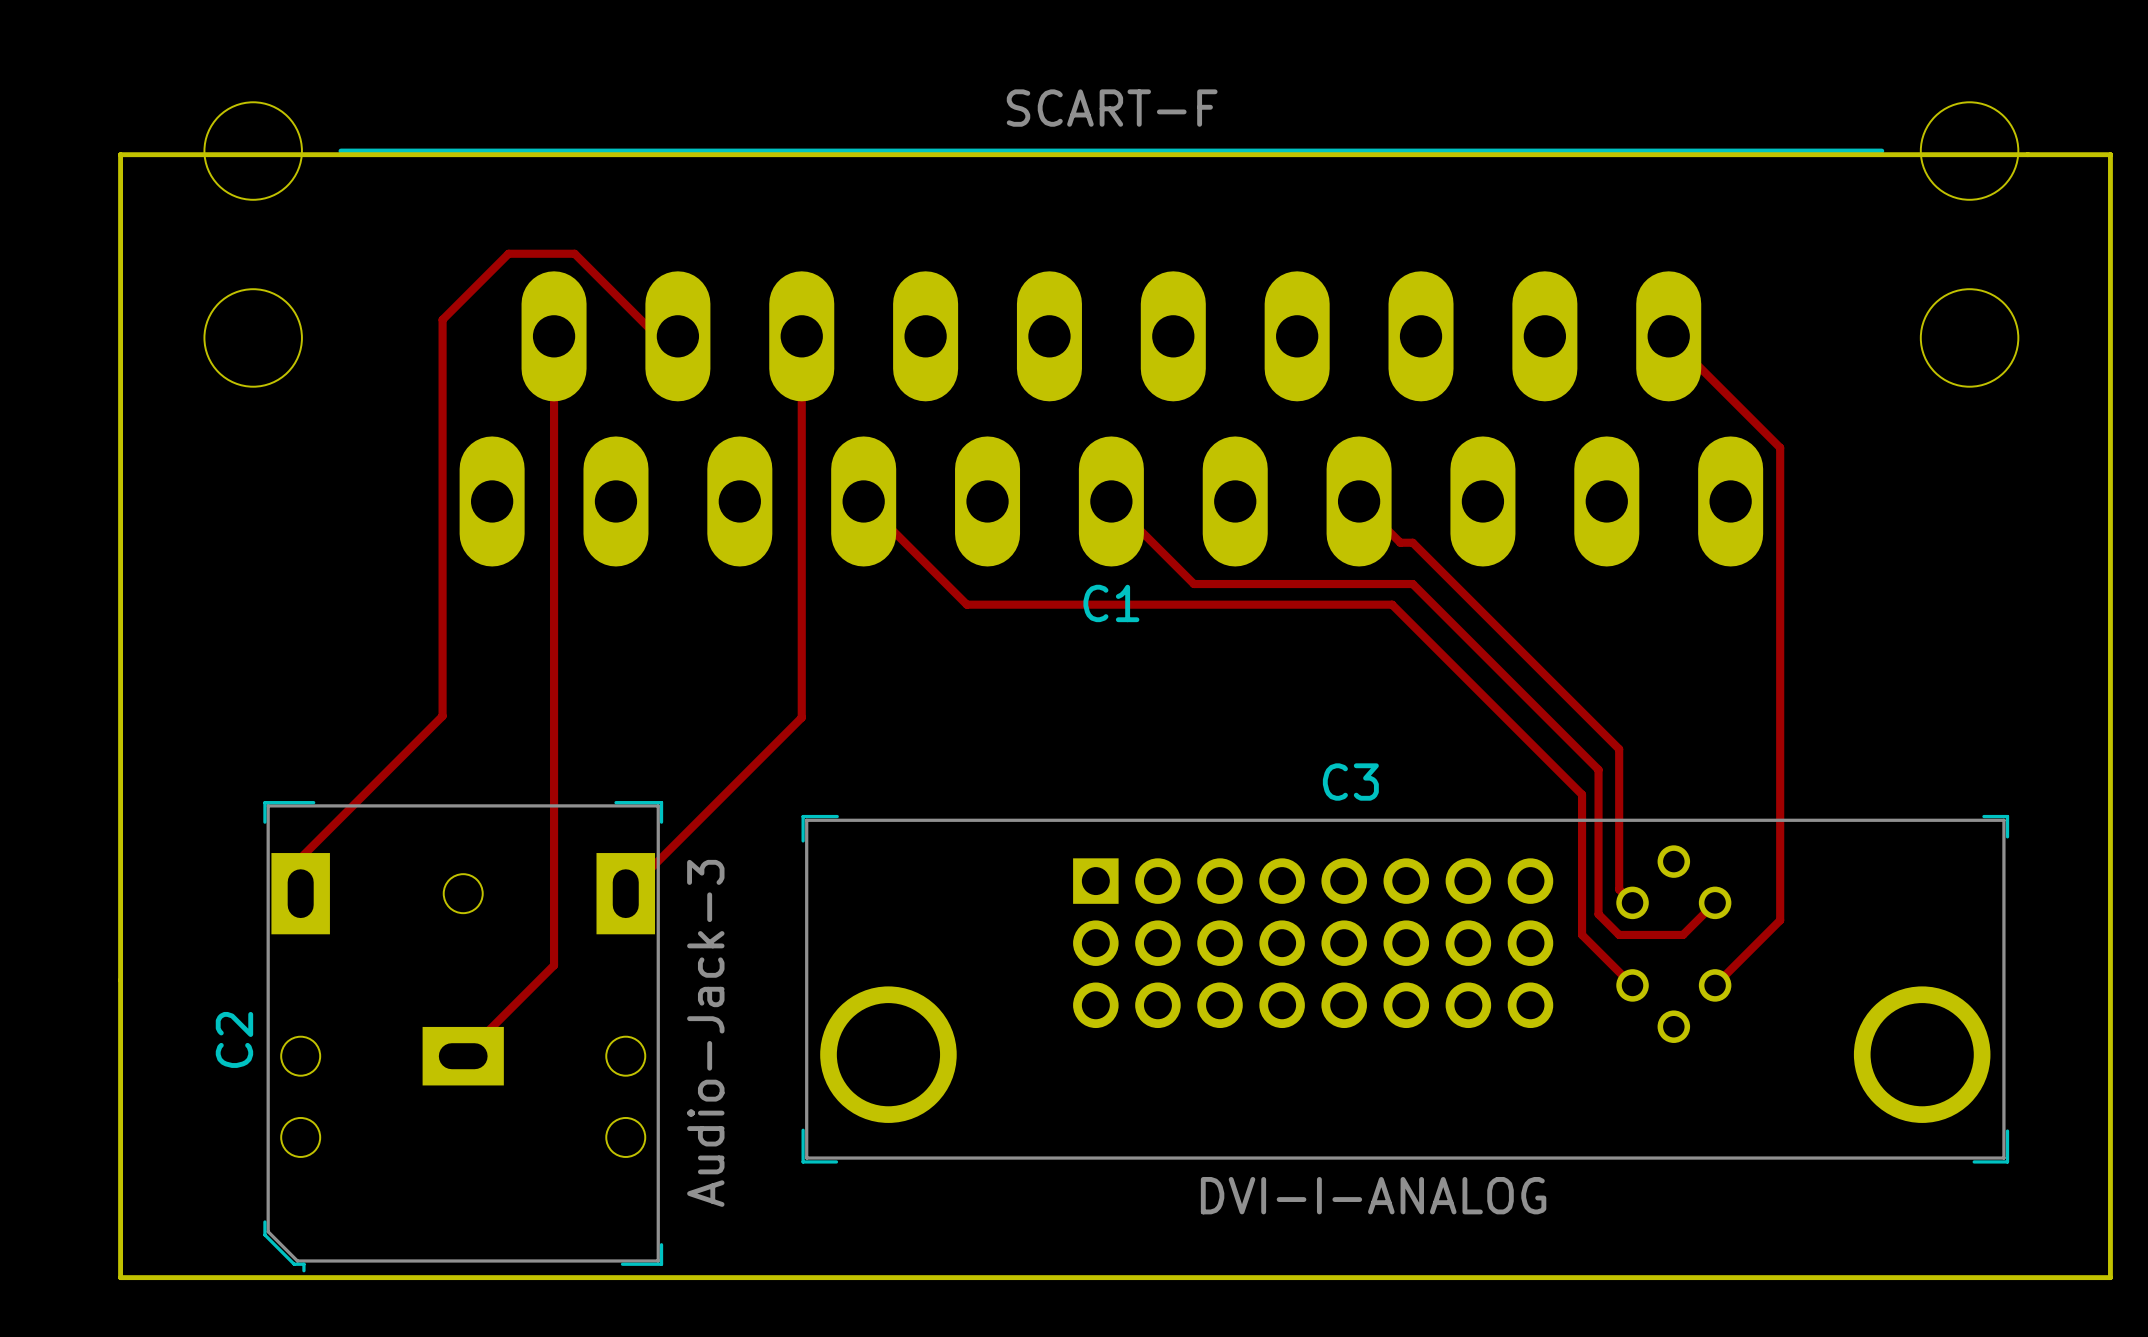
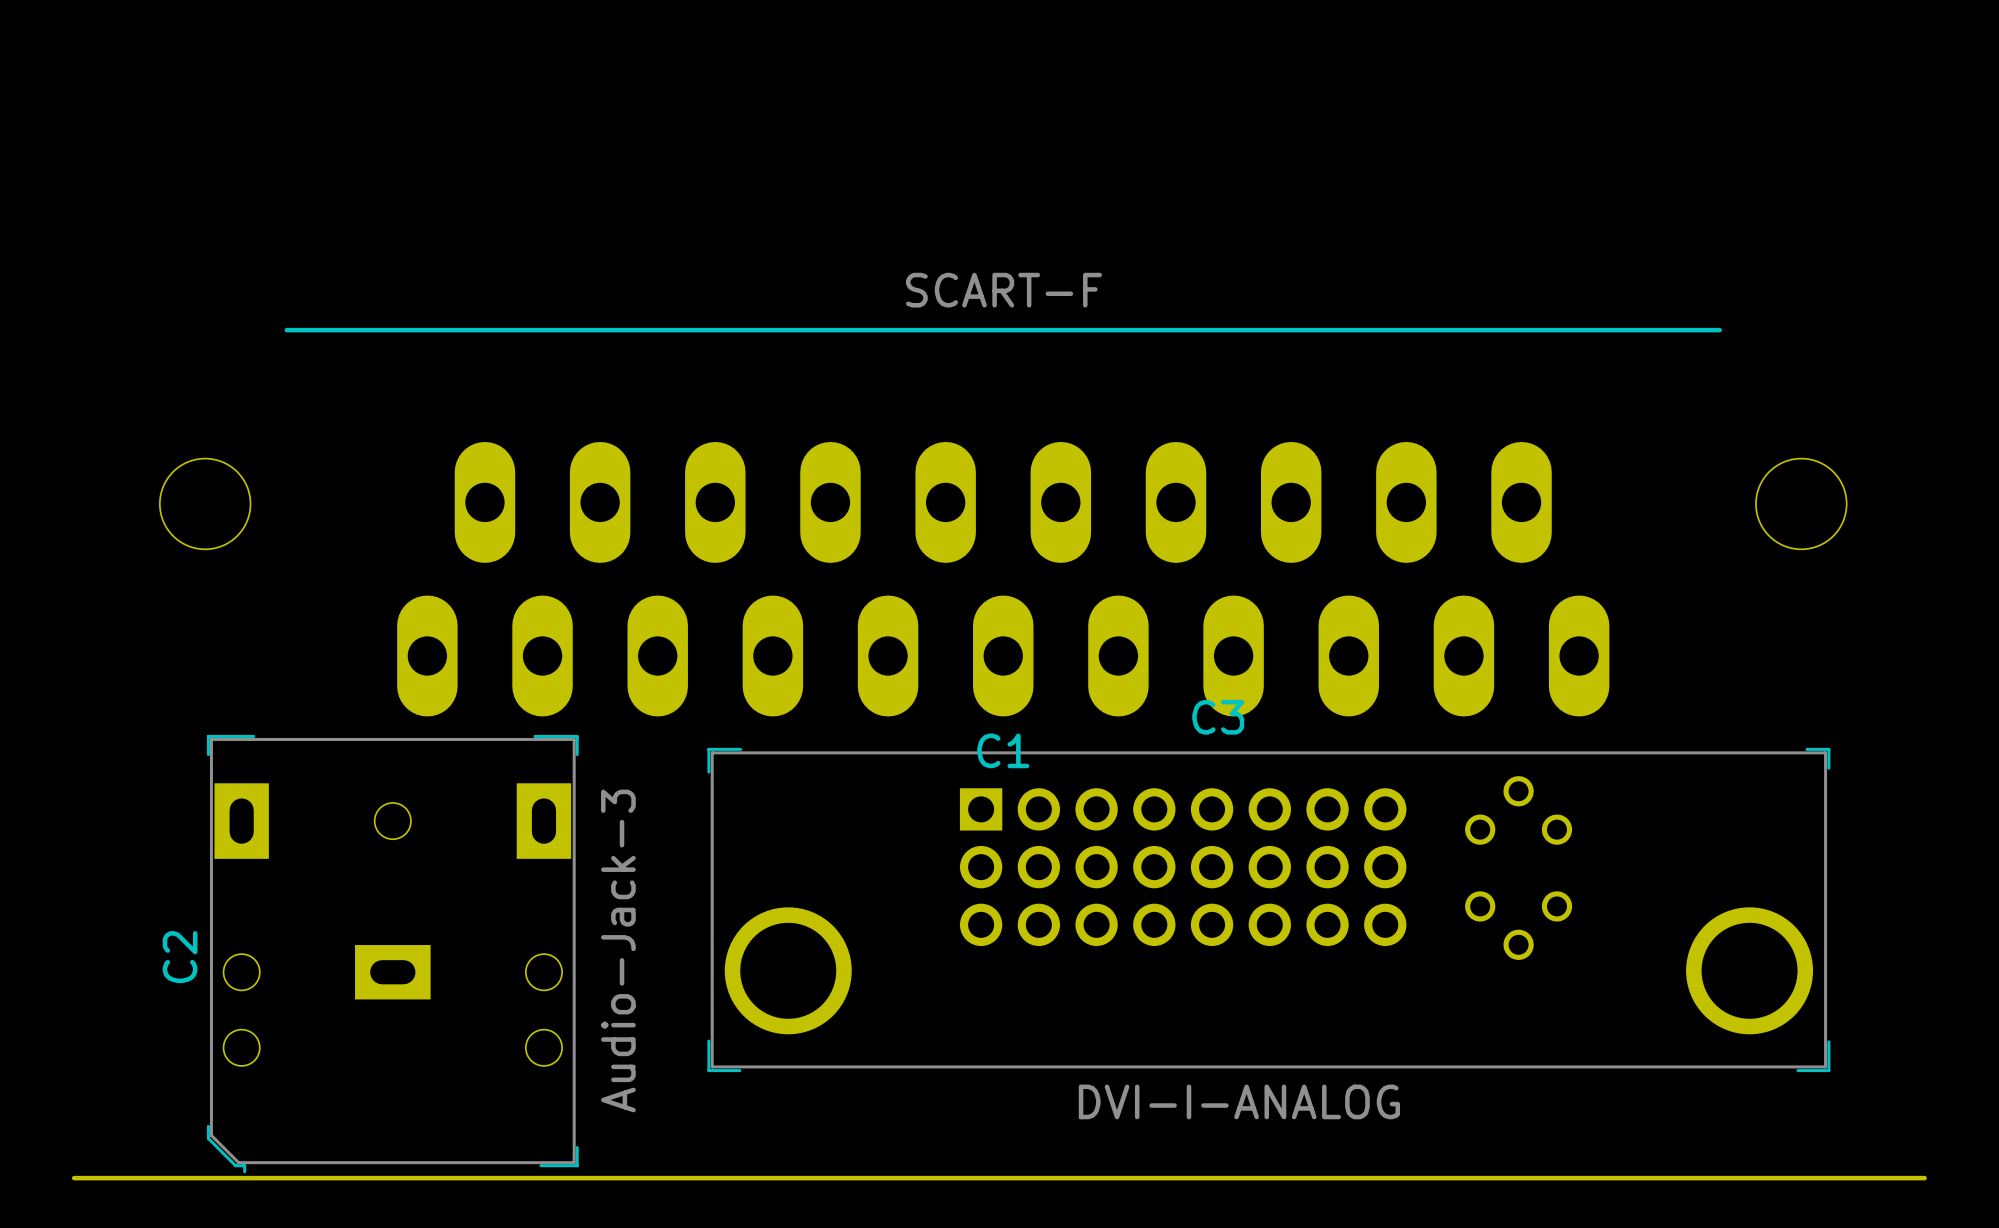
C1 footprint: [204, 102, 2019, 567] -> [159, 327, 1847, 717]
top track: (554, 336) (554, 965) (463, 1056) -> none
top track: (677, 336) (657, 336) (574, 253) (508, 253) (442, 319) (442, 716) (300, 858) -> none
top track: (801, 336) (801, 717) (625, 893) -> none
top track: (1668, 336) (1780, 447) (1780, 920) (1715, 985) -> none
top track: (863, 501) (966, 604) (1392, 604) (1582, 794) (1582, 934) (1632, 985) -> none
top track: (1111, 501) (1193, 584) (1412, 584) (1598, 769) (1598, 914) (1619, 934) (1683, 934) (1715, 902) -> none
top track: (1359, 501) (1400, 542) (1412, 542) (1619, 749) (1619, 889) (1632, 902) -> none
board edge: (120, 1277) (120, 154) (2110, 154) (2110, 1277) -> none

